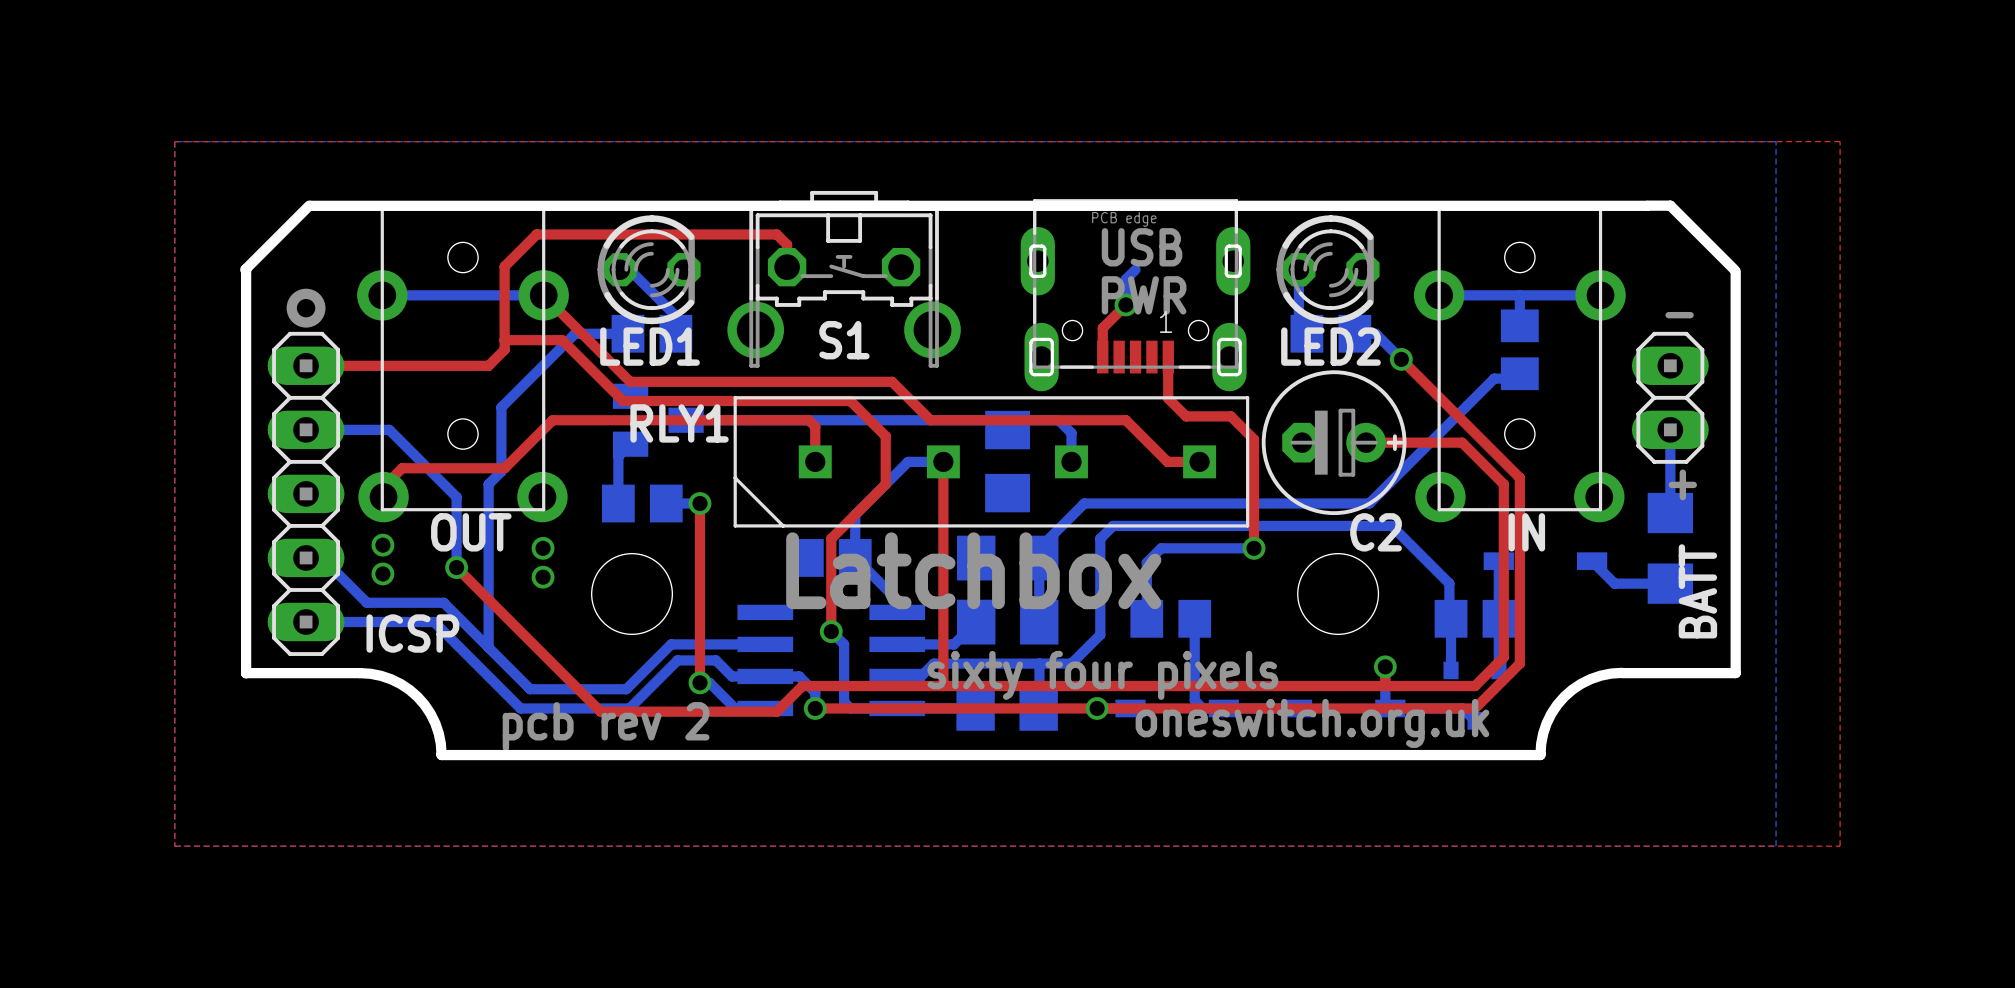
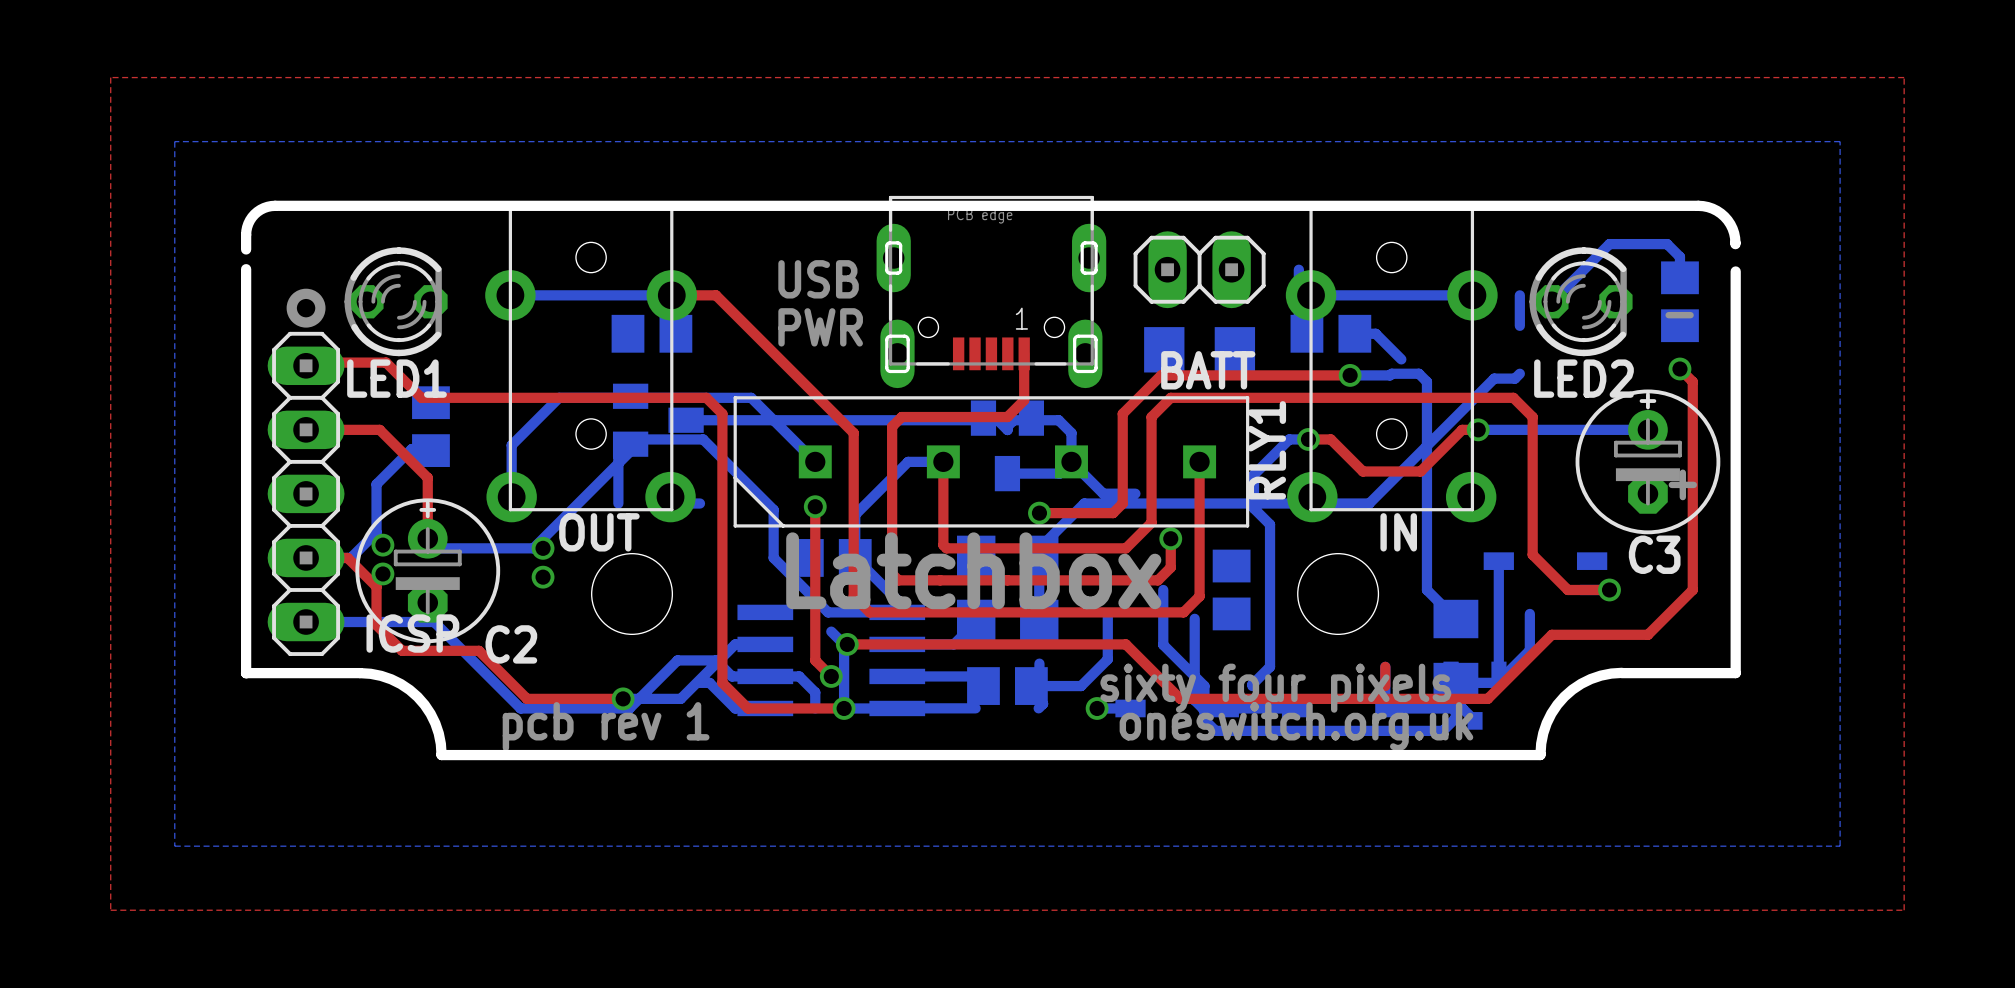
top zone outline: (174, 141) (174, 846) (1840, 846) (1840, 141) (174, 141) -> (110, 77) (110, 910) (1904, 910) (1904, 77) (110, 77)
bottom zone outline: (1776, 141) (1776, 846) -> (1776, 141) (1840, 141) (1840, 846) (1776, 846)
board edge: (309, 205) (245, 269) -> none
board edge: none -> (310, 205) (271, 206) (257, 211) (247, 227) (246, 249)
board edge: (1647, 205) (1670, 205) (1734, 269) -> (1647, 205) (1698, 205) (1712, 208) (1720, 213) (1730, 224) (1735, 244)
text position: USB (1142, 247) -> USB (818, 279)
top track: (787, 267) (787, 244) (776, 234) (536, 234) (504, 266) (504, 349) (488, 365) (306, 365) -> (815, 708) (748, 708) (722, 682) (722, 413) (706, 397) (421, 397) (386, 362) (309, 362) (306, 365)
bottom track: (619, 269) (629, 269) (677, 317) (675, 333) -> none
LED1 position: (649, 269) -> (396, 301)
bottom track: (1135, 269) (1125, 279) (1125, 304) -> none
LED2 position: (1328, 269) -> (1581, 301)
bottom track: none -> (1679, 277) (1679, 256) (1667, 244) (1609, 244) (1551, 301)
S1: (844, 279) -> none
bottom track: (382, 295) (510, 295) -> (543, 295) (671, 295)
top track: (543, 295) (630, 381) (892, 381) (930, 420) (1125, 420) (1167, 461) (1199, 461) -> (671, 295) (716, 295) (853, 433) (853, 596) (869, 612) (1183, 612) (1199, 596) (1199, 461)
part position: (1135, 295) -> (991, 291)
text position: PWR (1144, 295) -> PWR (820, 327)
bottom track: (1472, 295) (1600, 295) -> (1311, 295) (1439, 295)
top track: (1125, 304) (1102, 328) (1102, 357) -> none
via: (1125, 304) -> none
bottom track: (627, 333) (575, 333) (501, 407) (501, 471) (488, 484) (488, 647) -> none
top track: (504, 340) (562, 340) (623, 401) (850, 401) (885, 436) (885, 484) (831, 538) (831, 631) -> none
part position: (1519, 349) -> (1679, 301)
top track: none -> (1024, 353) (1024, 400) (1007, 417) (901, 417) (892, 426) (892, 573) (898, 580) (1157, 580) (1170, 567) (1170, 538)
top track: (1168, 357) (1168, 398) (1186, 416) (1230, 416) (1254, 439) (1254, 548) -> none
top track: (1401, 359) (1519, 477) (1519, 663) (1475, 708) (844, 708) -> none
via: (1401, 359) -> none
OUT position: (462, 363) -> (591, 363)
IN position: (1519, 363) -> (1391, 363)
top track: none -> (1679, 369) (1692, 381) (1692, 589) (1647, 634) (1551, 634) (1487, 698) (1180, 698) (1125, 644) (847, 644)
via: none -> (1679, 369)
bottom track: none -> (1350, 375) (1418, 373) (1426, 381) (1426, 590) (1455, 619)
top track: none -> (1350, 375) (1161, 375) (1122, 413) (1122, 503) (1113, 513) (1039, 513)
via: none -> (1350, 375)
BATT rotation: 0° (1670, 397) -> 90° clockwise (1199, 269)
BATT position: (1670, 397) -> (1199, 269)
part footprint: [985, 410, 1030, 513] -> [970, 400, 1044, 492]
RLY1 name rotation: 0° (679, 423) -> 90° counterclockwise (1266, 450)
RLY1 name position: RLY1 (679, 423) -> RLY1 (1266, 450)
bottom track: (306, 429) (389, 429) (456, 497) (456, 567) -> none
top track: none -> (306, 429) (379, 429) (427, 477) (427, 538)
bottom track: none -> (1478, 429) (1647, 429)
top track: none -> (1478, 429) (1462, 429) (1420, 471) (1362, 471) (1330, 439) (1308, 439)
via: none -> (1478, 429)
bottom track: (1670, 429) (1670, 513) -> none
bottom track: none -> (1308, 439) (1289, 439) (1254, 474) (1254, 508) (1270, 524) (1270, 666) (1252, 686)
via: none -> (1308, 439)
C2 rotation: 0° (1334, 442) -> 90° counterclockwise (427, 570)
C2 position: (1334, 442) -> (427, 570)
top track: (1366, 442) (1462, 442) (1503, 484) (1503, 657) (1475, 686) (802, 686) (776, 711) (600, 711) (456, 567) -> none
bottom track: none -> (430, 450) (411, 449) (376, 484) (376, 532) (350, 557) (322, 557)
bottom track: none -> (815, 461) (751, 397) (559, 397) (511, 445) (511, 497)
top track: (815, 461) (815, 426) (808, 420) (552, 420) (504, 468) (402, 468) (383, 486) (383, 497) -> none
C3: none -> (1647, 461)
bottom track: none -> (1007, 473) (1059, 473) (1071, 461) (1103, 493) (1135, 493)
part rotation: 0° (642, 503) -> 90° clockwise (430, 426)
part position: (642, 503) -> (430, 426)
top track: (699, 503) (699, 682) -> none
via: (699, 503) -> none
top track: none -> (815, 506) (815, 660) (831, 676)
via: none -> (815, 506)
via: none -> (1039, 513)
bottom track: none -> (427, 538) (437, 548) (533, 548) (642, 439) (703, 439) (773, 509) (773, 557) (828, 612) (897, 612)
via: none -> (1170, 538)
top track: (943, 545) (943, 686) -> (943, 545) (946, 548) (1125, 548) (1151, 522) (1151, 417) (1170, 397) (1513, 397) (1532, 417) (1532, 554) (1567, 589) (1609, 589)
bottom track: (1254, 548) (1161, 548) (1146, 562) (1146, 618) -> none
via: (1254, 548) -> none
part rotation: 0° (1670, 548) -> 90° clockwise (1199, 349)
part position: (1670, 548) -> (1199, 349)
top track: none -> (306, 557) (347, 557) (376, 586) (376, 625) (402, 650) (479, 650) (527, 698) (623, 698)
bottom track: (322, 557) (366, 602) (443, 602) (530, 689) (626, 689) (671, 644) (735, 644) -> (623, 698) (680, 698) (735, 644)
bottom track: (1592, 561) (1614, 583) (1670, 583) -> none
via: (456, 567) -> none
bottom track: none -> (1163, 589) (1163, 644) (1204, 686) (1204, 719) (1215, 730) (1442, 730) (1455, 718) (1455, 682)
via: none -> (1609, 589)
BATT name position: BATT (1697, 591) -> BATT (1208, 370)
bottom track: none -> (1107, 613) (1107, 659) (1081, 686) (1031, 686)
bottom track: none -> (1529, 613) (1529, 650) (1497, 682) (1455, 682)
part rotation: 0° (1170, 618) -> 90° clockwise (1231, 589)
part position: (1170, 618) -> (1231, 589)
part: (1475, 618) -> none
via position: (831, 631) -> (847, 644)
part: none -> (1455, 650)
via: (1385, 666) -> none
bottom track: (1451, 670) (1449, 583) (1391, 525) (1113, 525) (1100, 538) (1100, 634) (1071, 663) (933, 663) (920, 676) -> (983, 686) (973, 676) (920, 676)
text position: sixty four pixels (1102, 675) -> sixty four pixels (1275, 688)
via: none -> (831, 676)
via: (699, 682) -> none
part footprint: [956, 685, 1058, 731] -> [967, 667, 1048, 705]
via: none -> (623, 698)
via: (815, 708) -> none
via: none -> (844, 708)
text position: oneswitch.org.uk (1312, 723) -> oneswitch.org.uk (1296, 726)
text: pcb rev 2 (606, 726) -> pcb rev 1 (606, 726)

